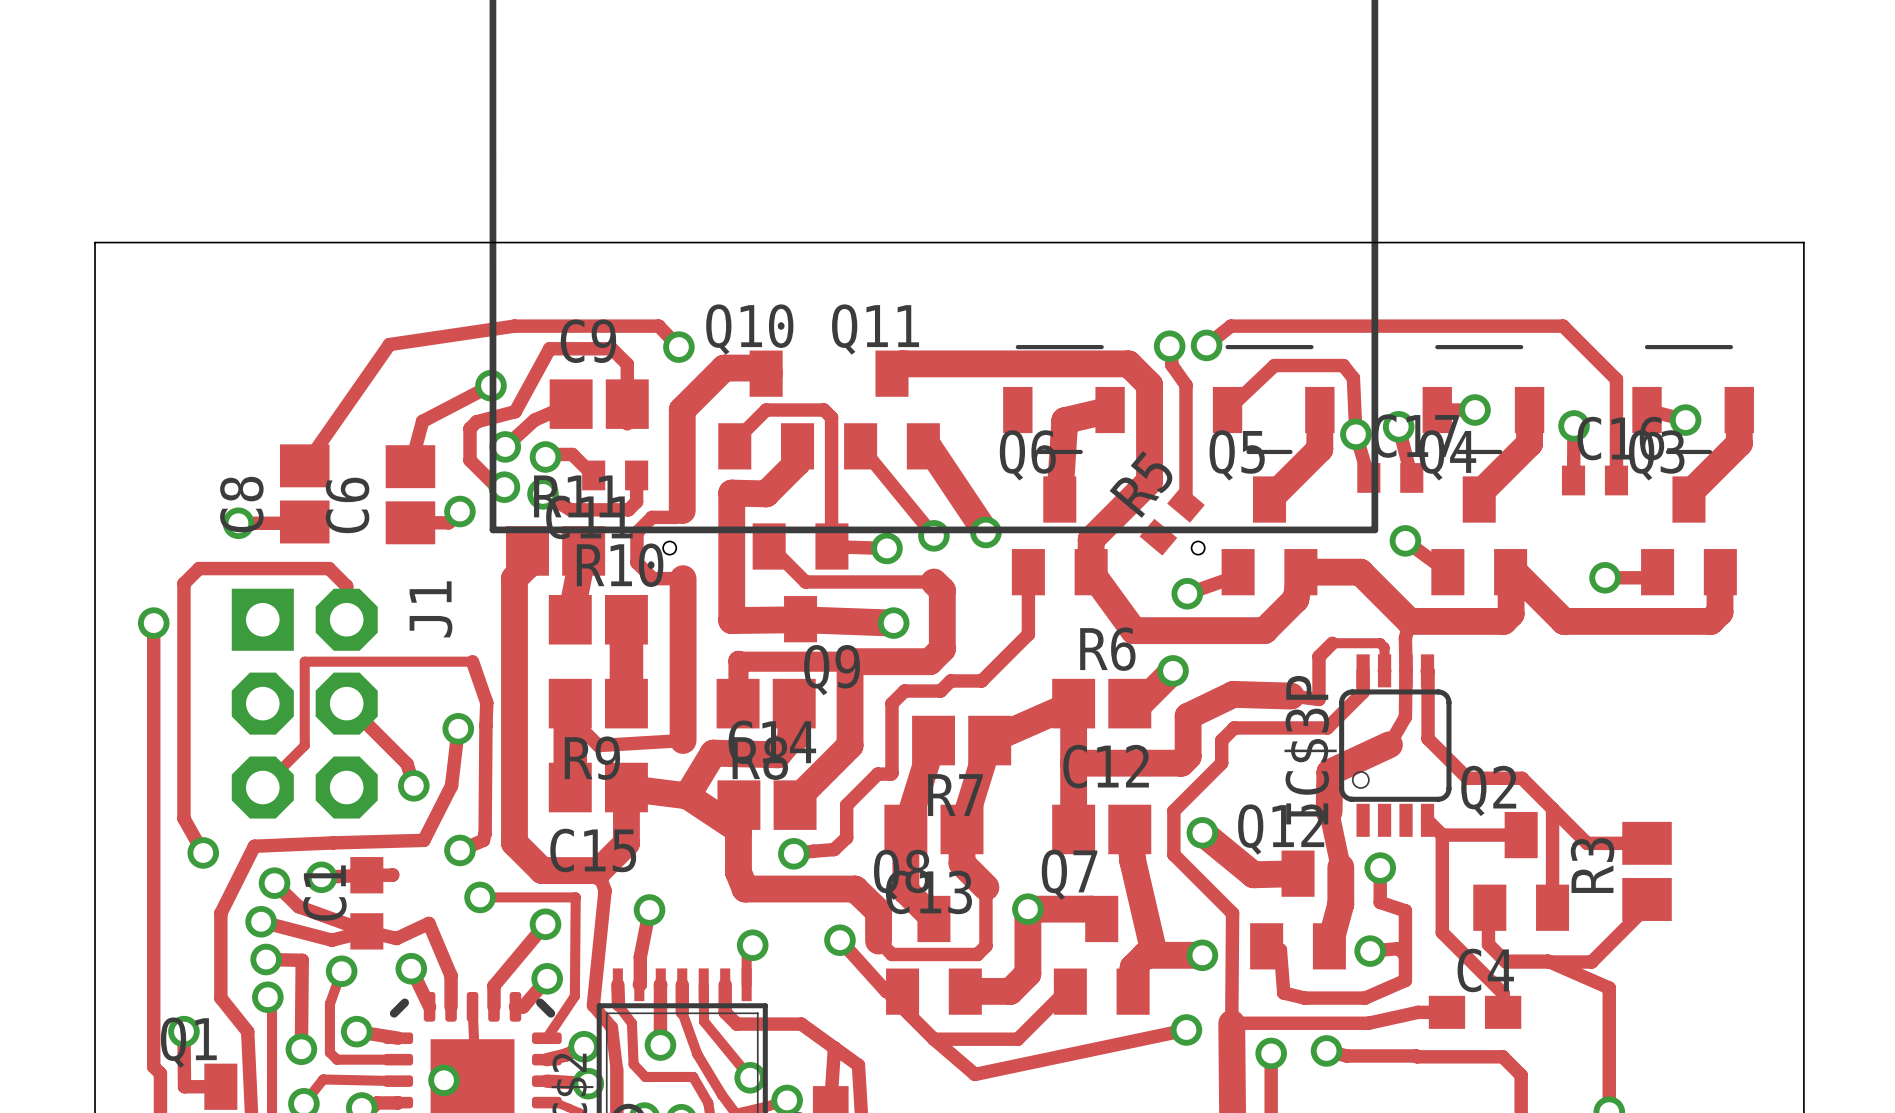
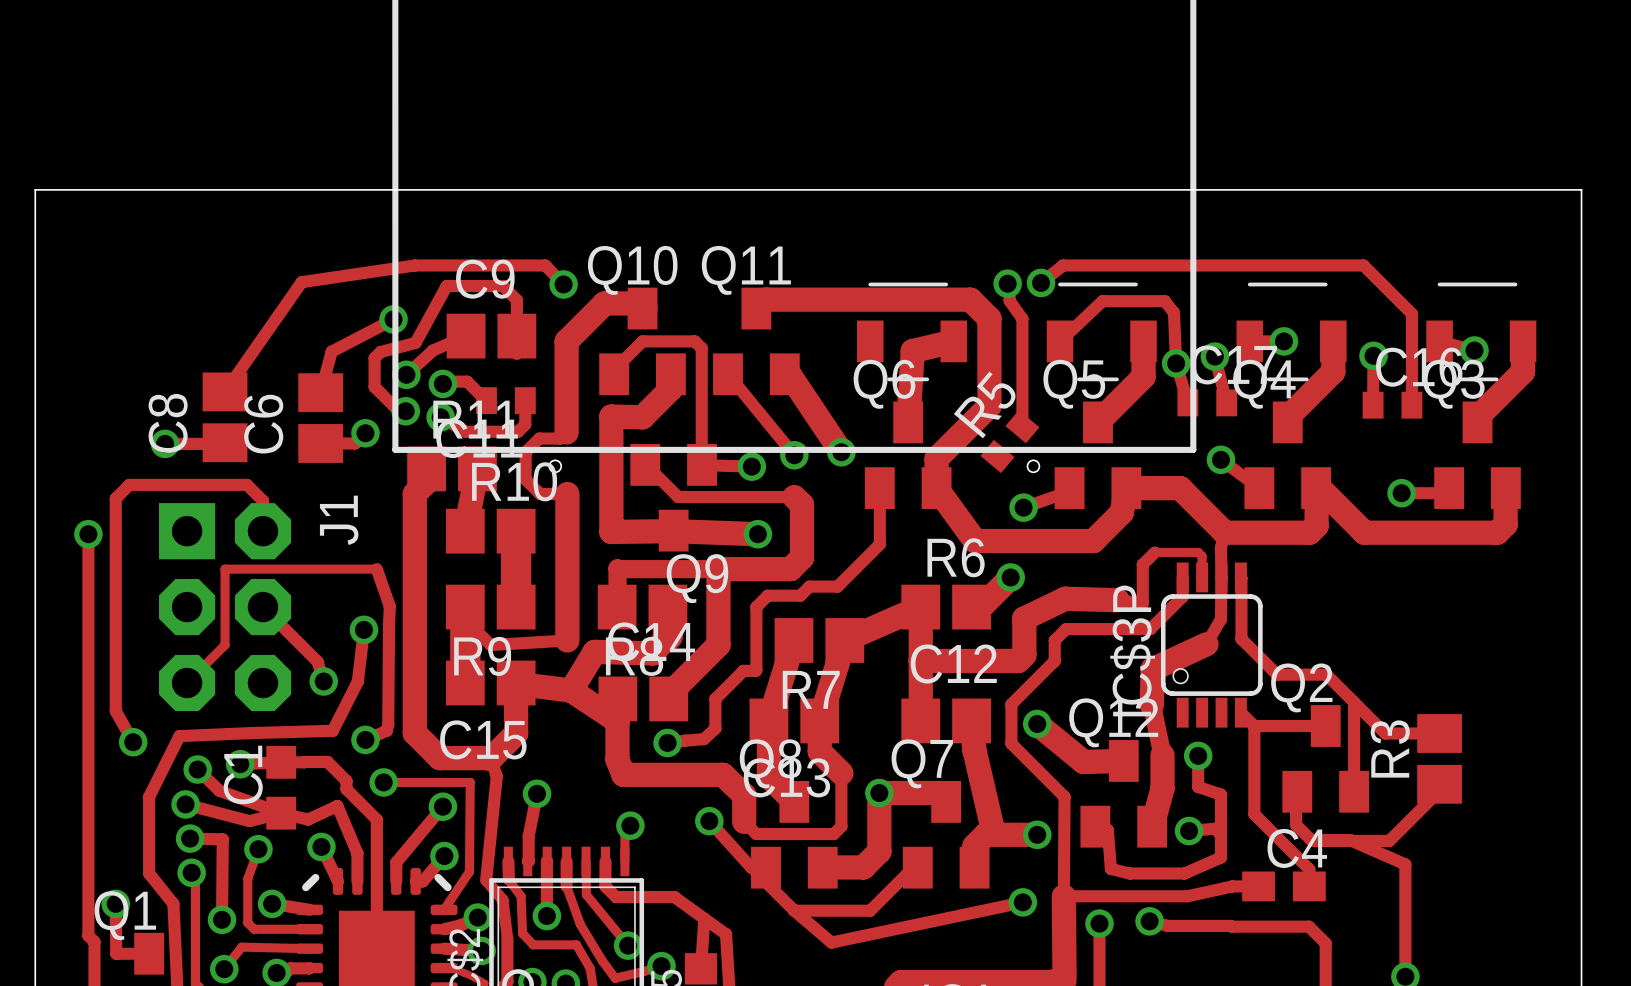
track: none -> (304, 761) (327, 761) (346, 780) (346, 789) (376, 819) (376, 948)
via: (444, 1080) -> none

